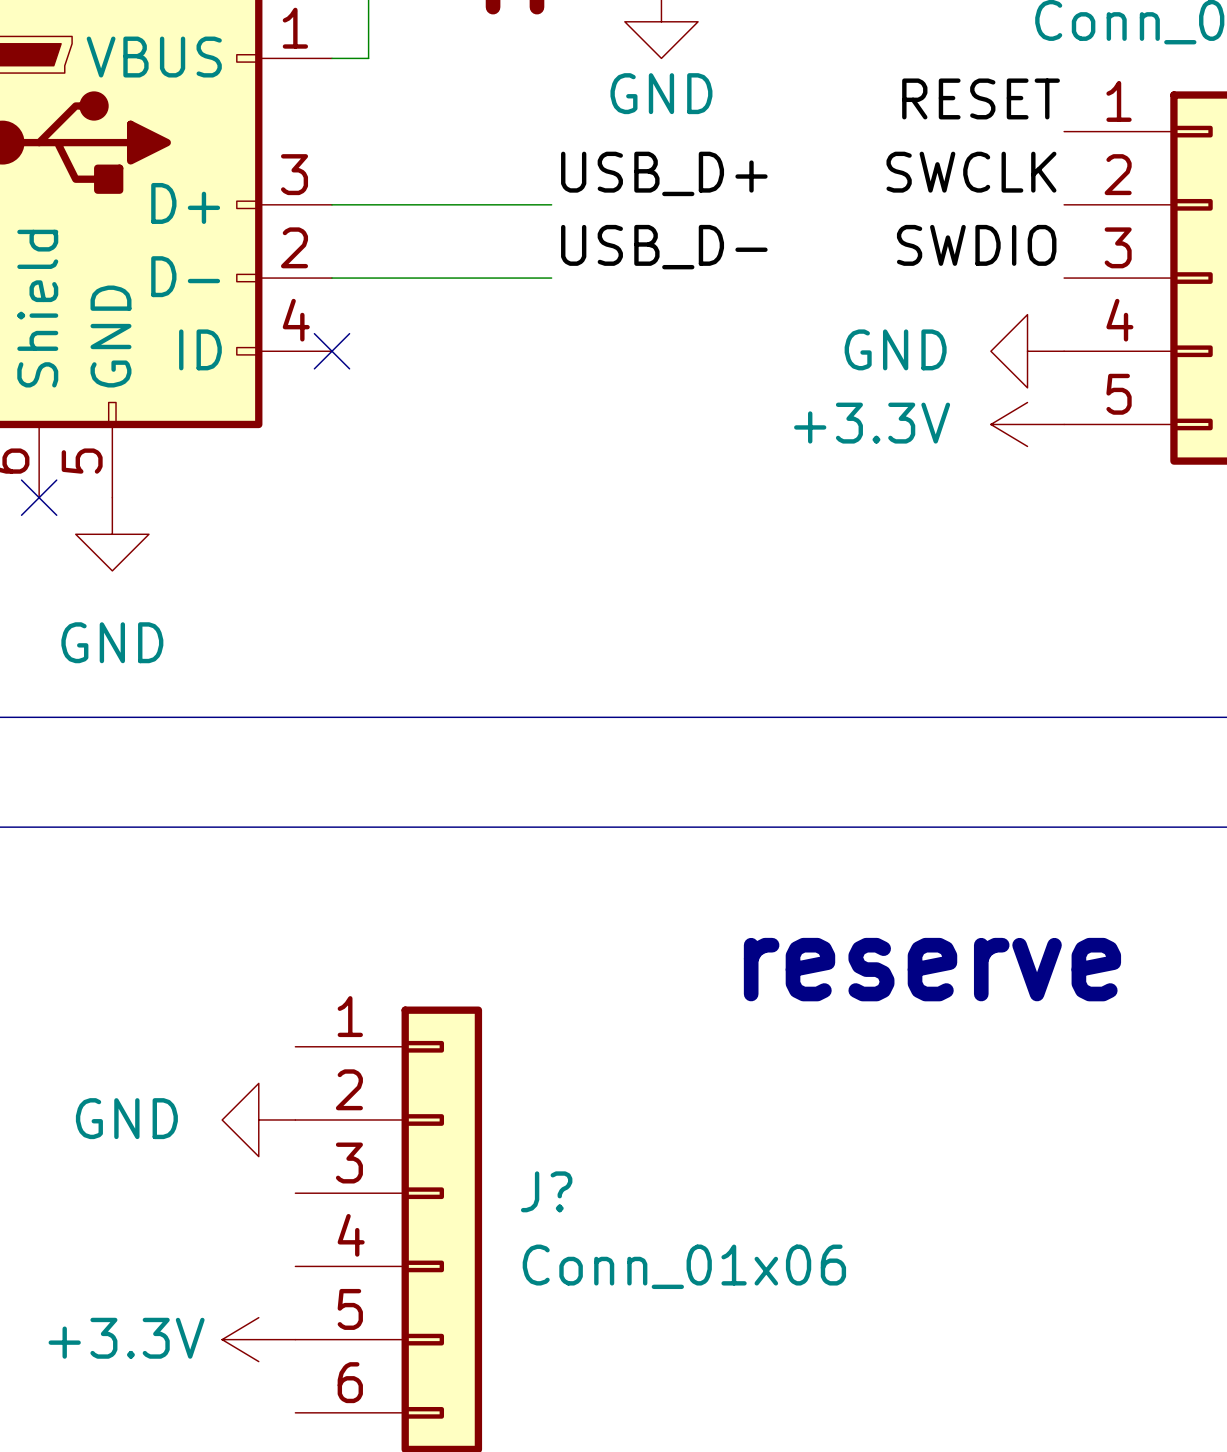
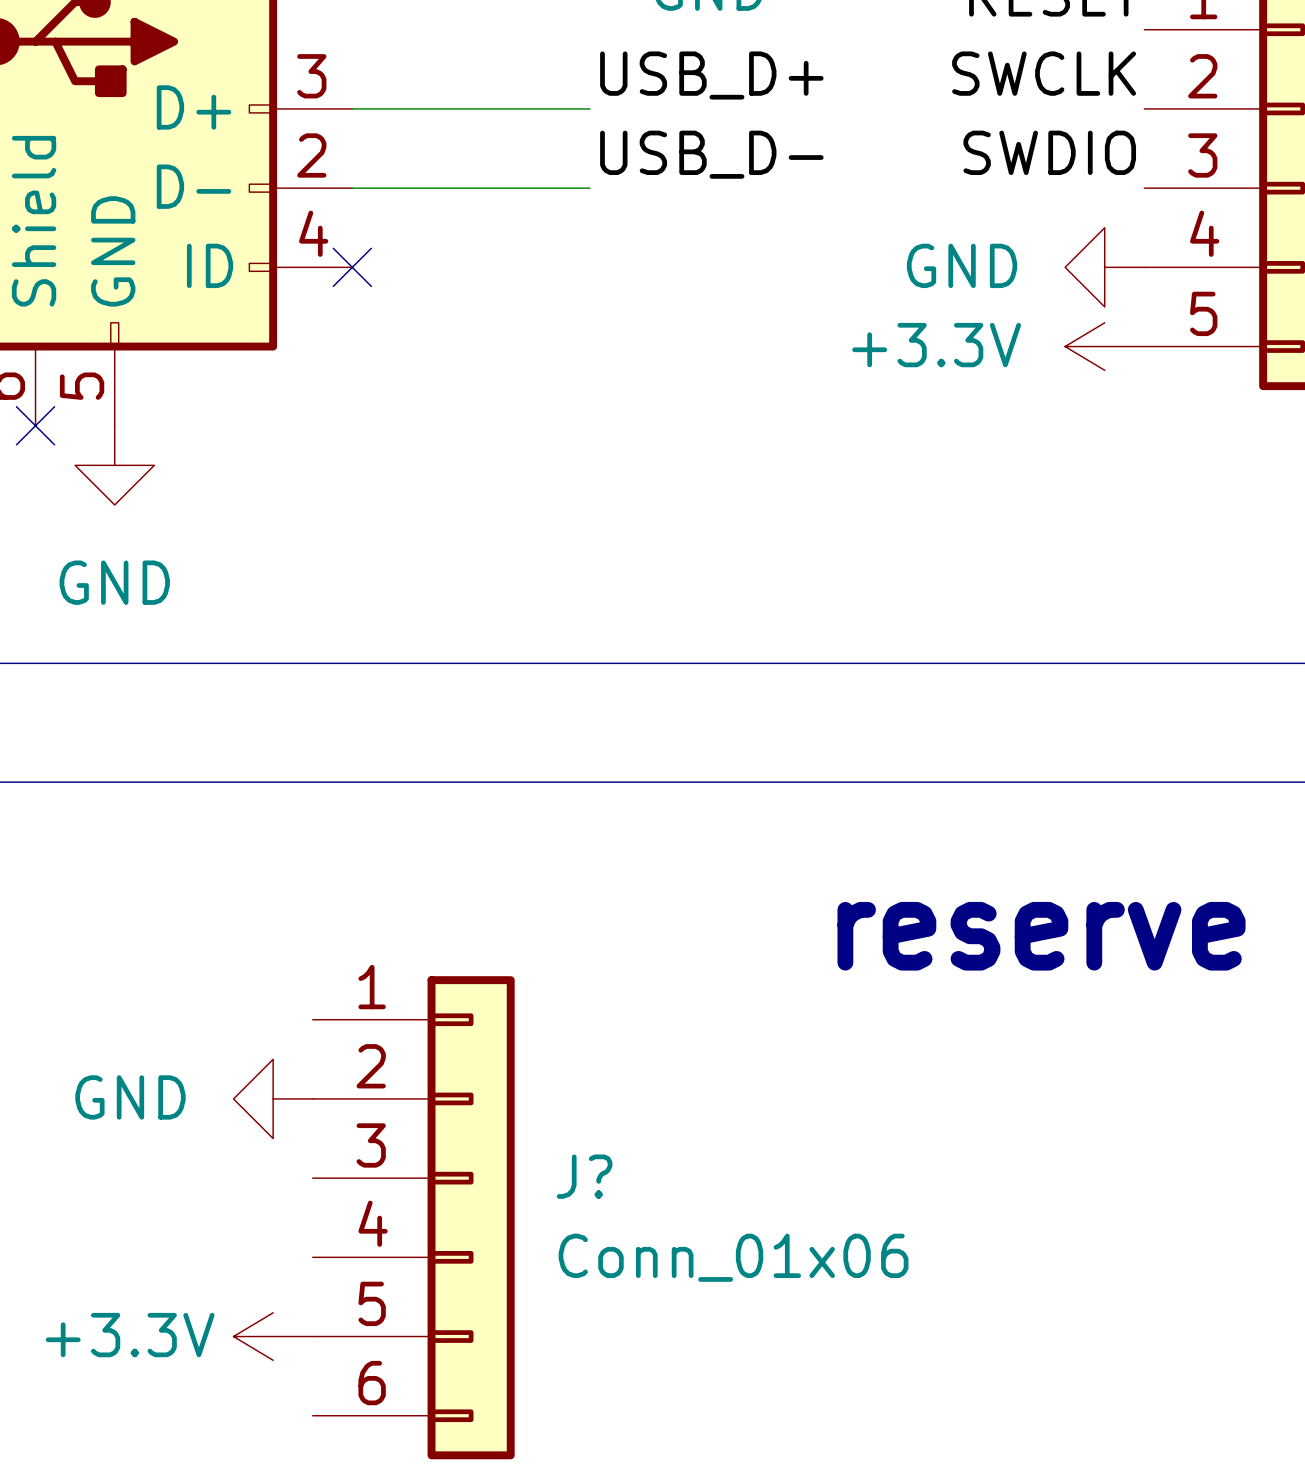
text position: reserve (932, 969) -> reserve (1041, 936)

